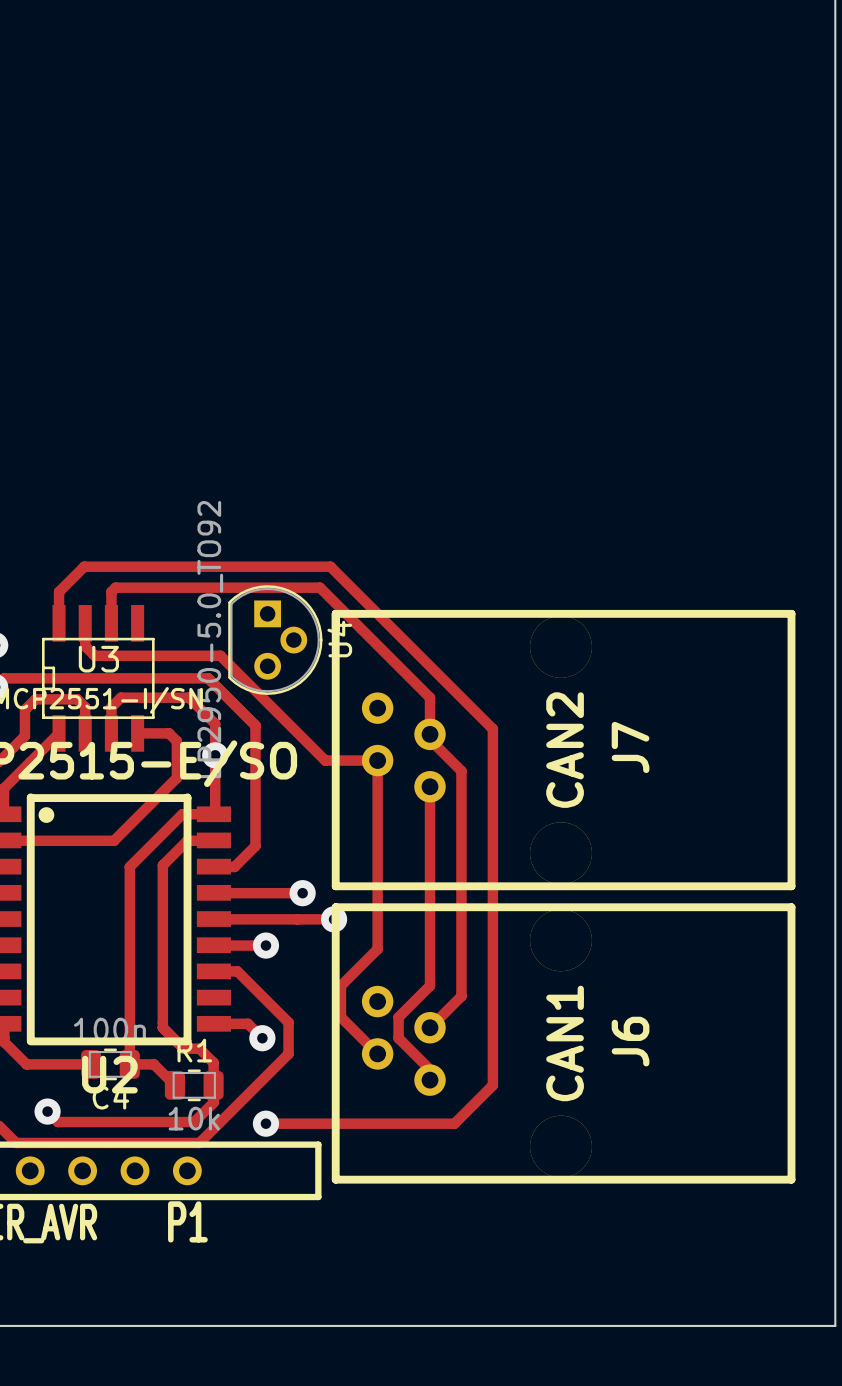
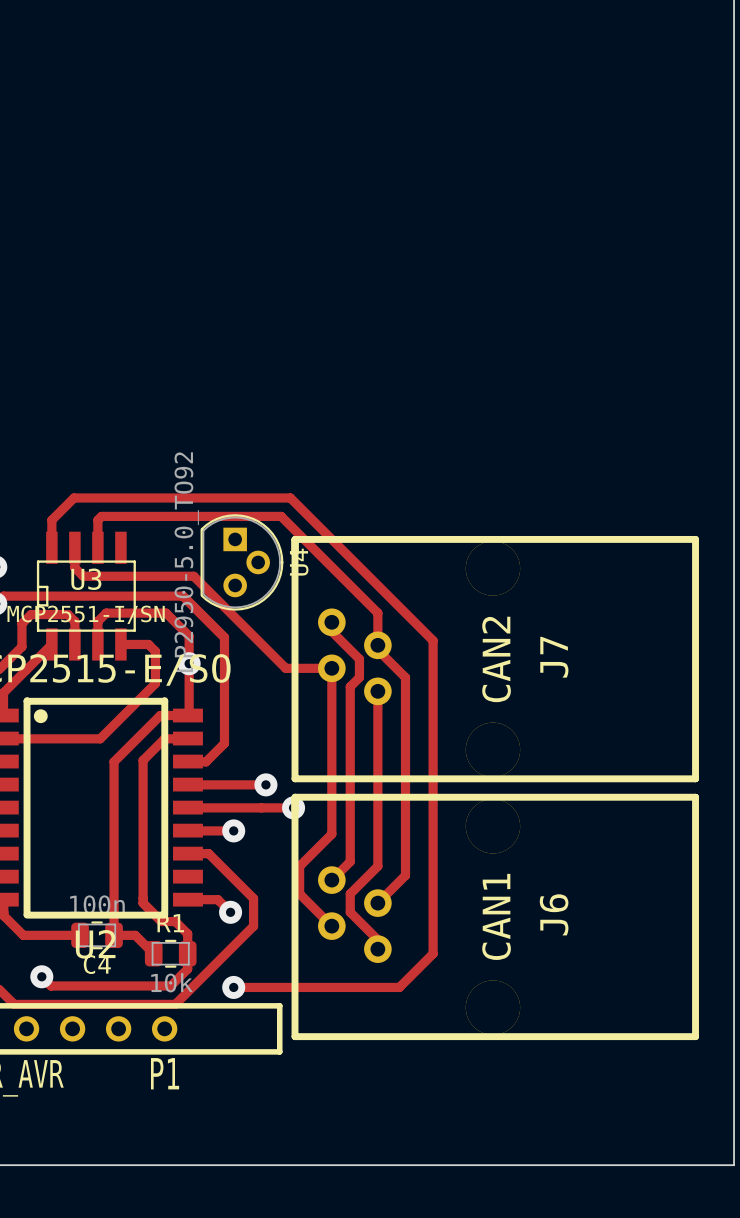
track: none -> (331, 622) (331, 631) (359, 659) (359, 677) (350, 686) (350, 861) (331, 880)

